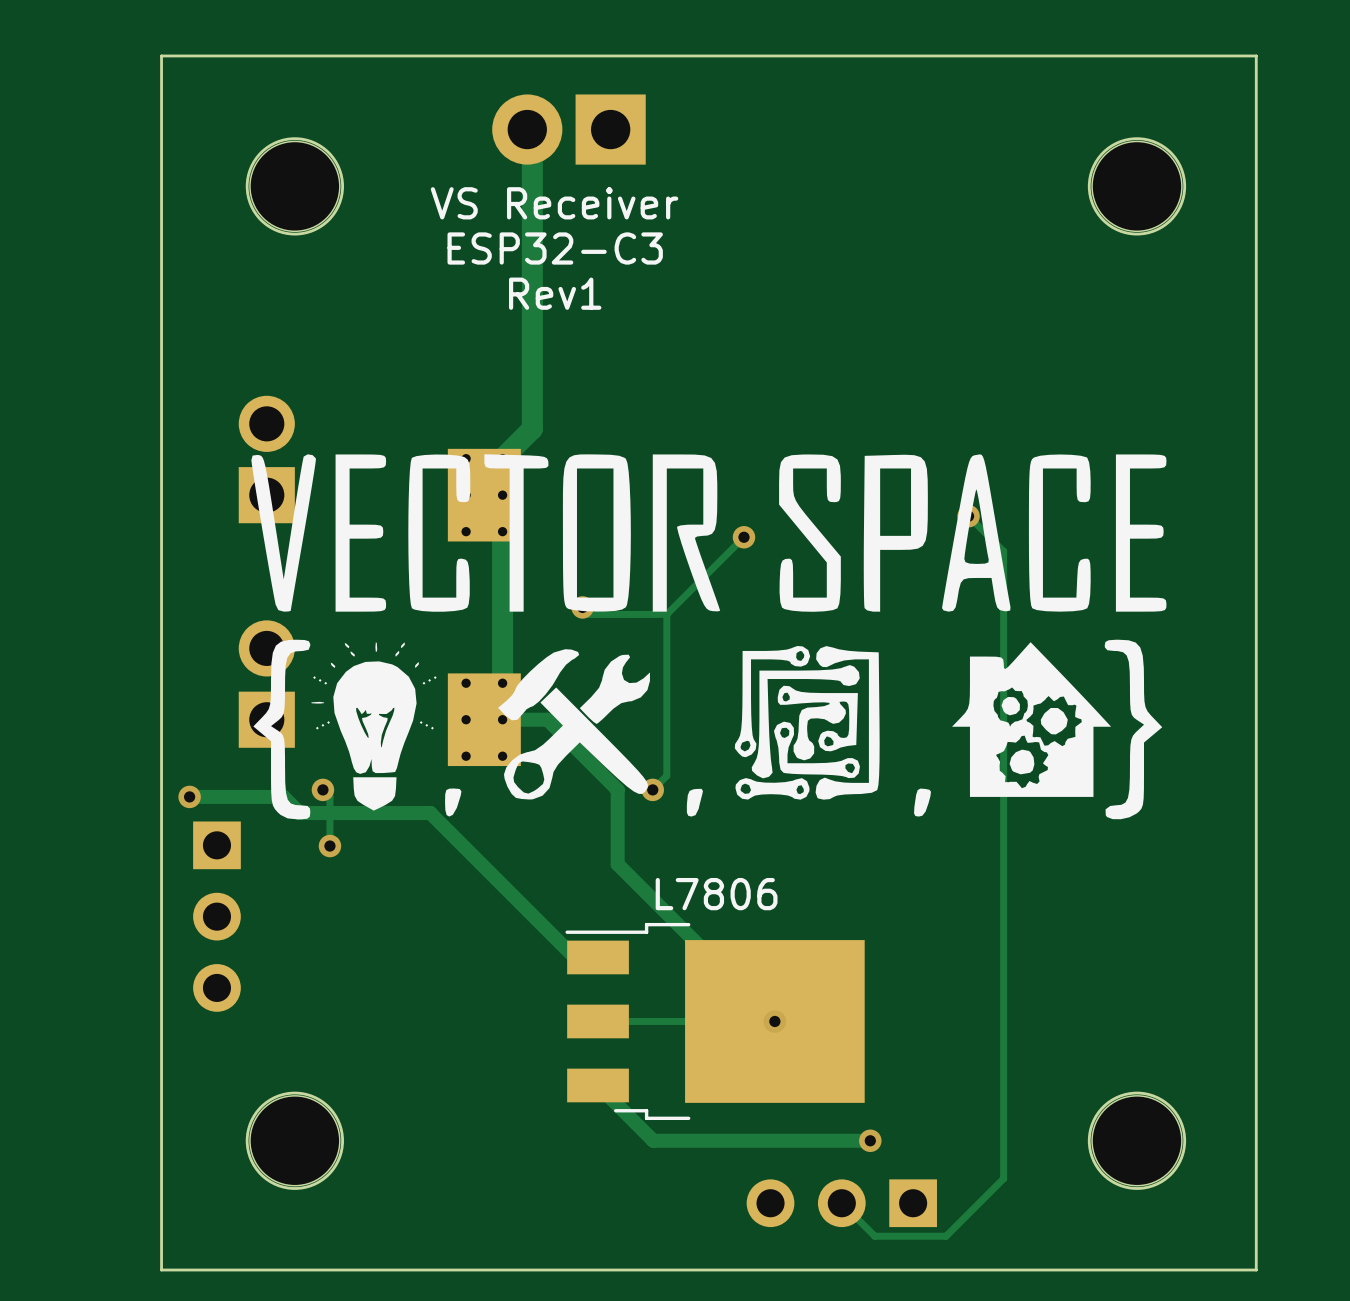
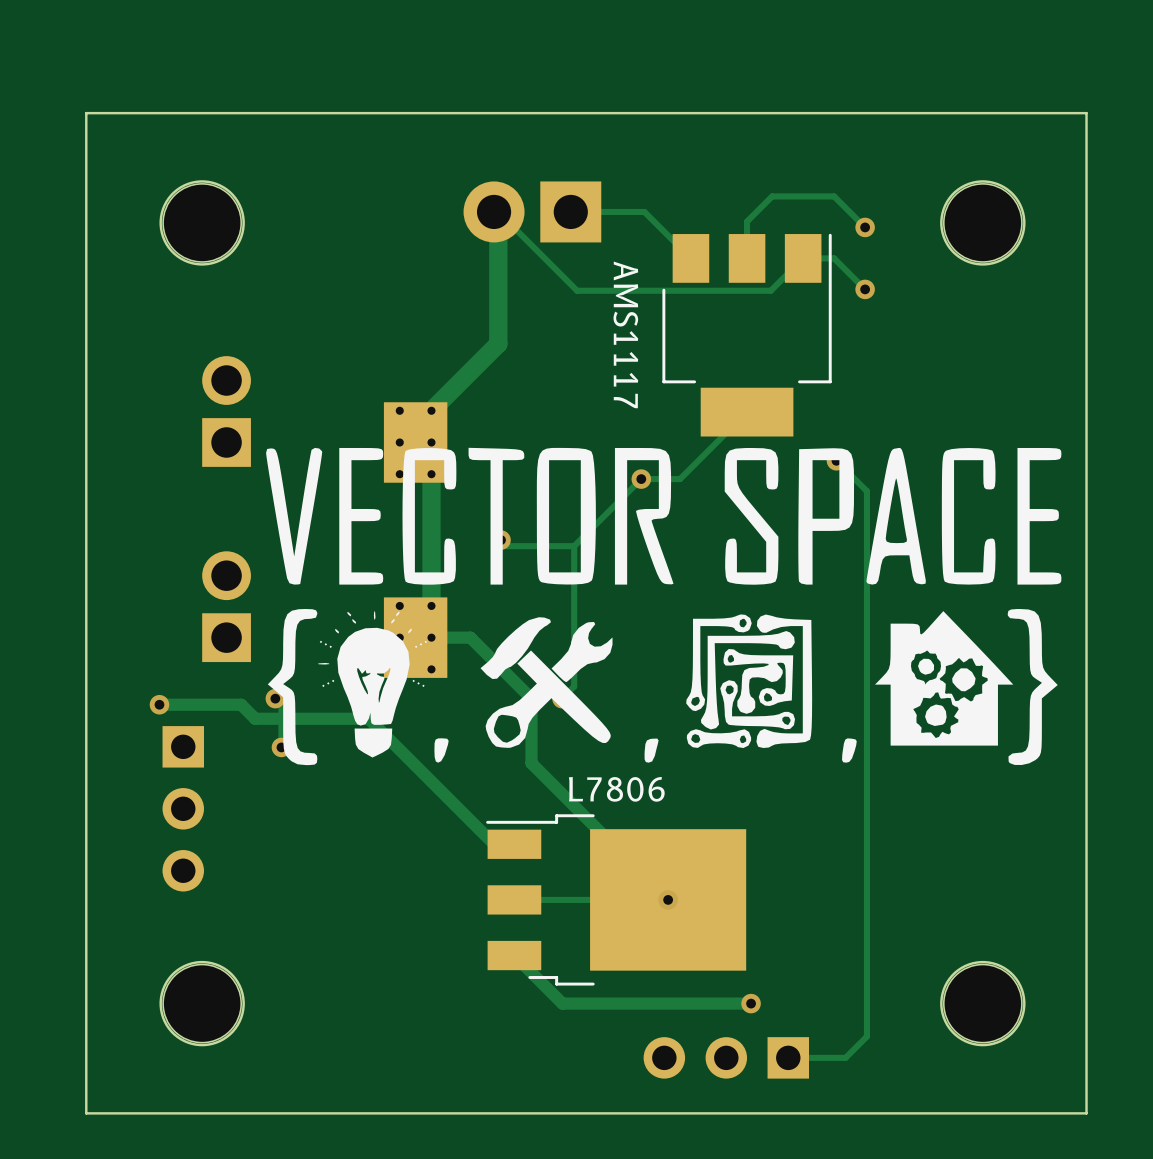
board edge: (1256, 116) (1256, 55) (161, 55) (161, 1270) (1256, 1270) (1256, 1267) -> (1086, 113) (86, 113) (86, 1113) (1086, 1113)
track: (527, 129) (532, 134) (532, 428) -> (865, 289) (834, 258) (803, 258) (770, 290) (577, 290) (498, 211) (494, 211) (498, 216) (498, 343) (457, 384)
part: (568, 129) -> none
part position: (294, 186) -> (202, 222)
round board edge position: (294, 186) -> (202, 222)
part position: (1136, 186) -> (982, 222)
round board edge position: (1136, 186) -> (982, 222)
text: VS Receiver (554, 203) -> none
part: none -> (532, 211)
track: none -> (570, 211) (644, 211) (690, 258)
track: none -> (865, 227) (834, 196) (772, 196) (747, 221) (747, 258)
via: none -> (865, 227)
text: ESP32-C3 (555, 248) -> none
text: Rev1 (555, 293) -> none
via: none -> (865, 289)
AMS1117: none -> (747, 335)
track: none -> (747, 412) (680, 479) (641, 479)
drawing position: (708, 636) -> (663, 606)
part position: (294, 1140) -> (202, 1003)
round board edge position: (294, 1140) -> (202, 1003)
track: (979, 1203) (946, 1236) (874, 1236) (841, 1203) -> (845, 1057) (788, 1057)

